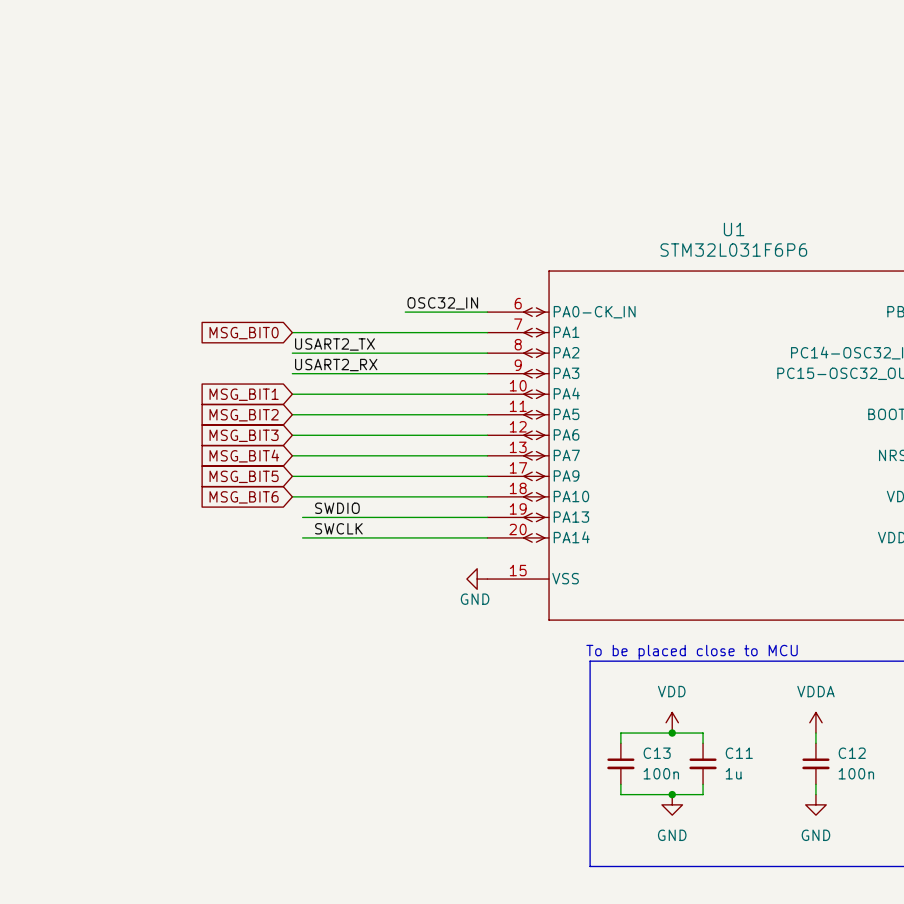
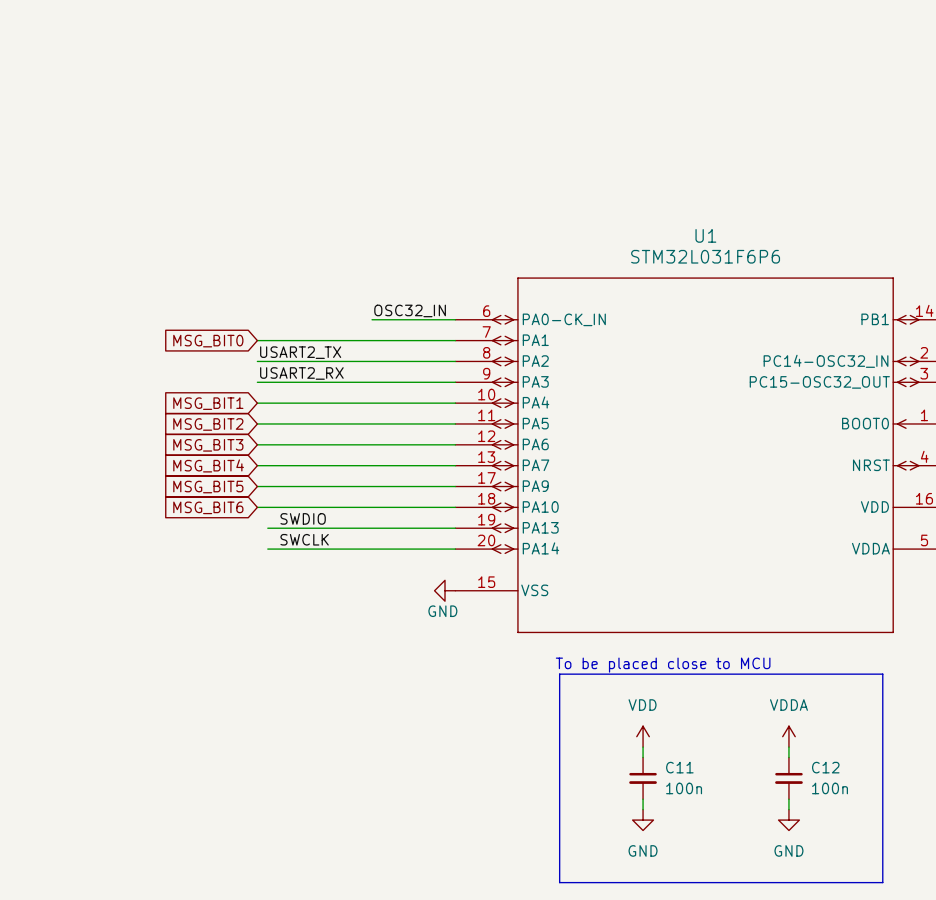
wire: none -> (643, 747) (643, 757)
junction: (672, 733) -> none
wire: (620, 743) (620, 733) (703, 733) (703, 743) -> none
C13: 100n (620, 763) -> none
C11 position: (703, 763) -> (643, 778)
C11 value: 1u (733, 773) -> 100n (684, 788)
wire: (620, 784) (620, 794) (703, 794) (703, 784) -> none
wire: none -> (643, 799) (643, 809)
junction: (672, 794) -> none

